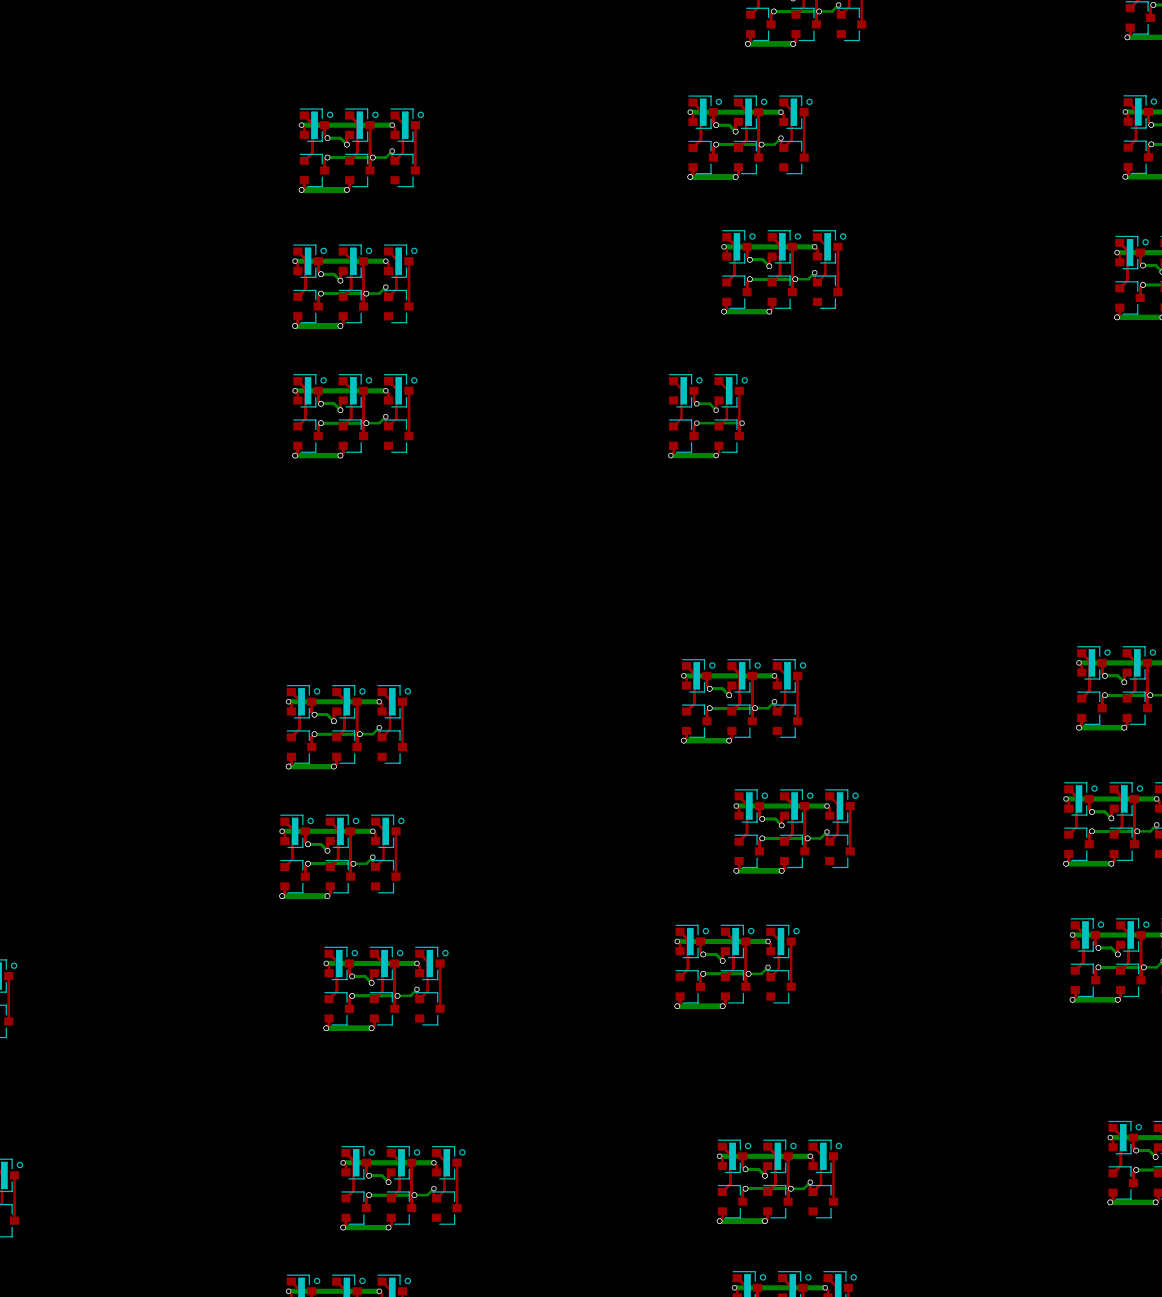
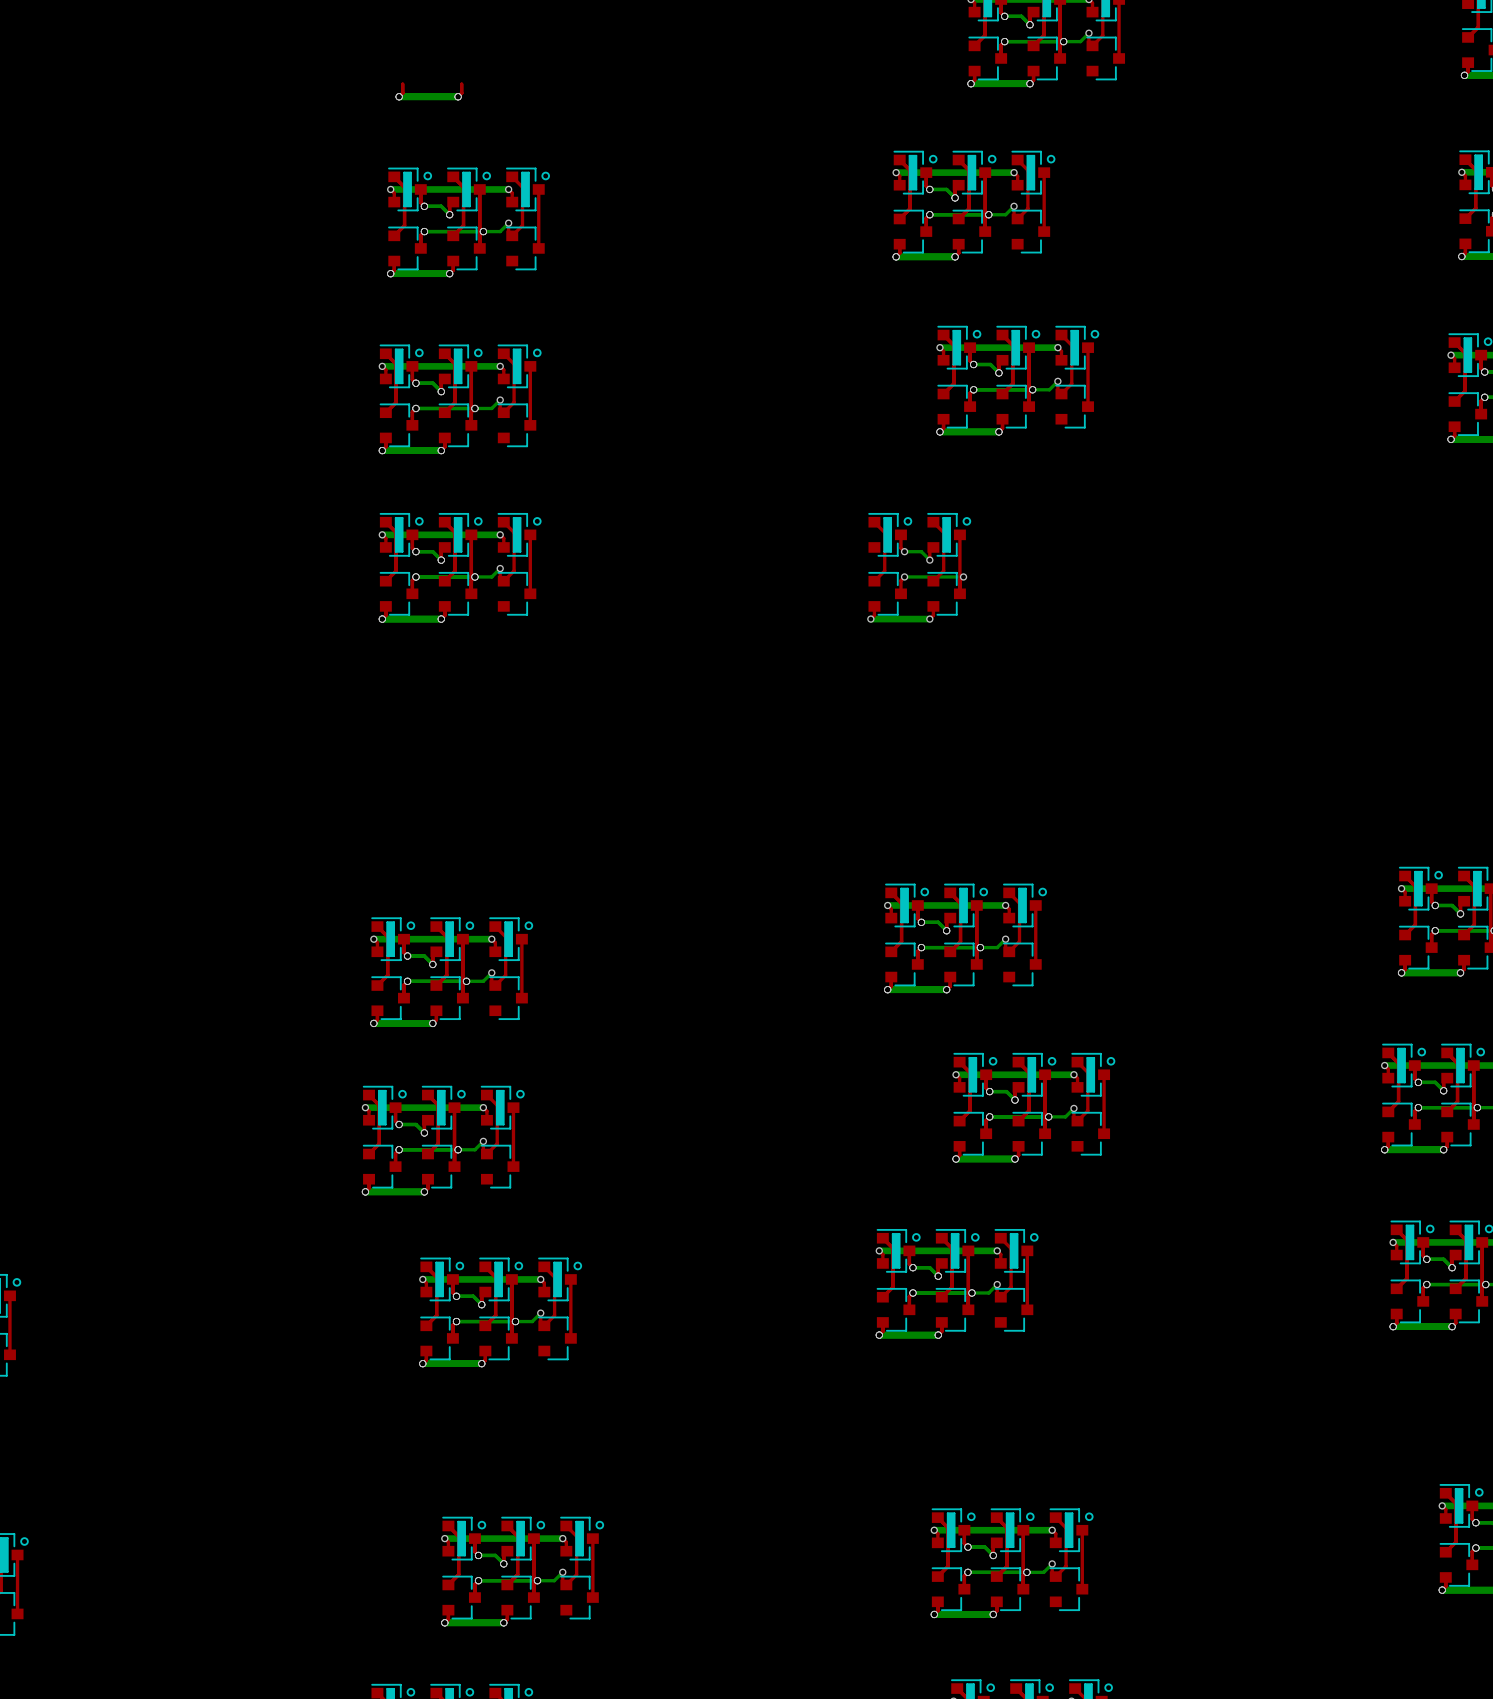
top track: none -> (402, 84) (402, 93) (399, 96)
top track: none -> (461, 84) (461, 93) (458, 96)
bottom track: none -> (399, 96) (458, 96)
via: none -> (399, 96)
via: none -> (458, 96)

